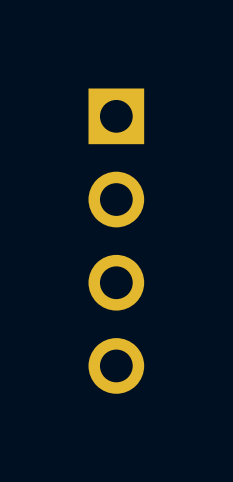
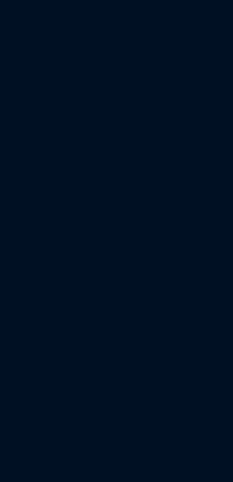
part: (116, 241) -> none

